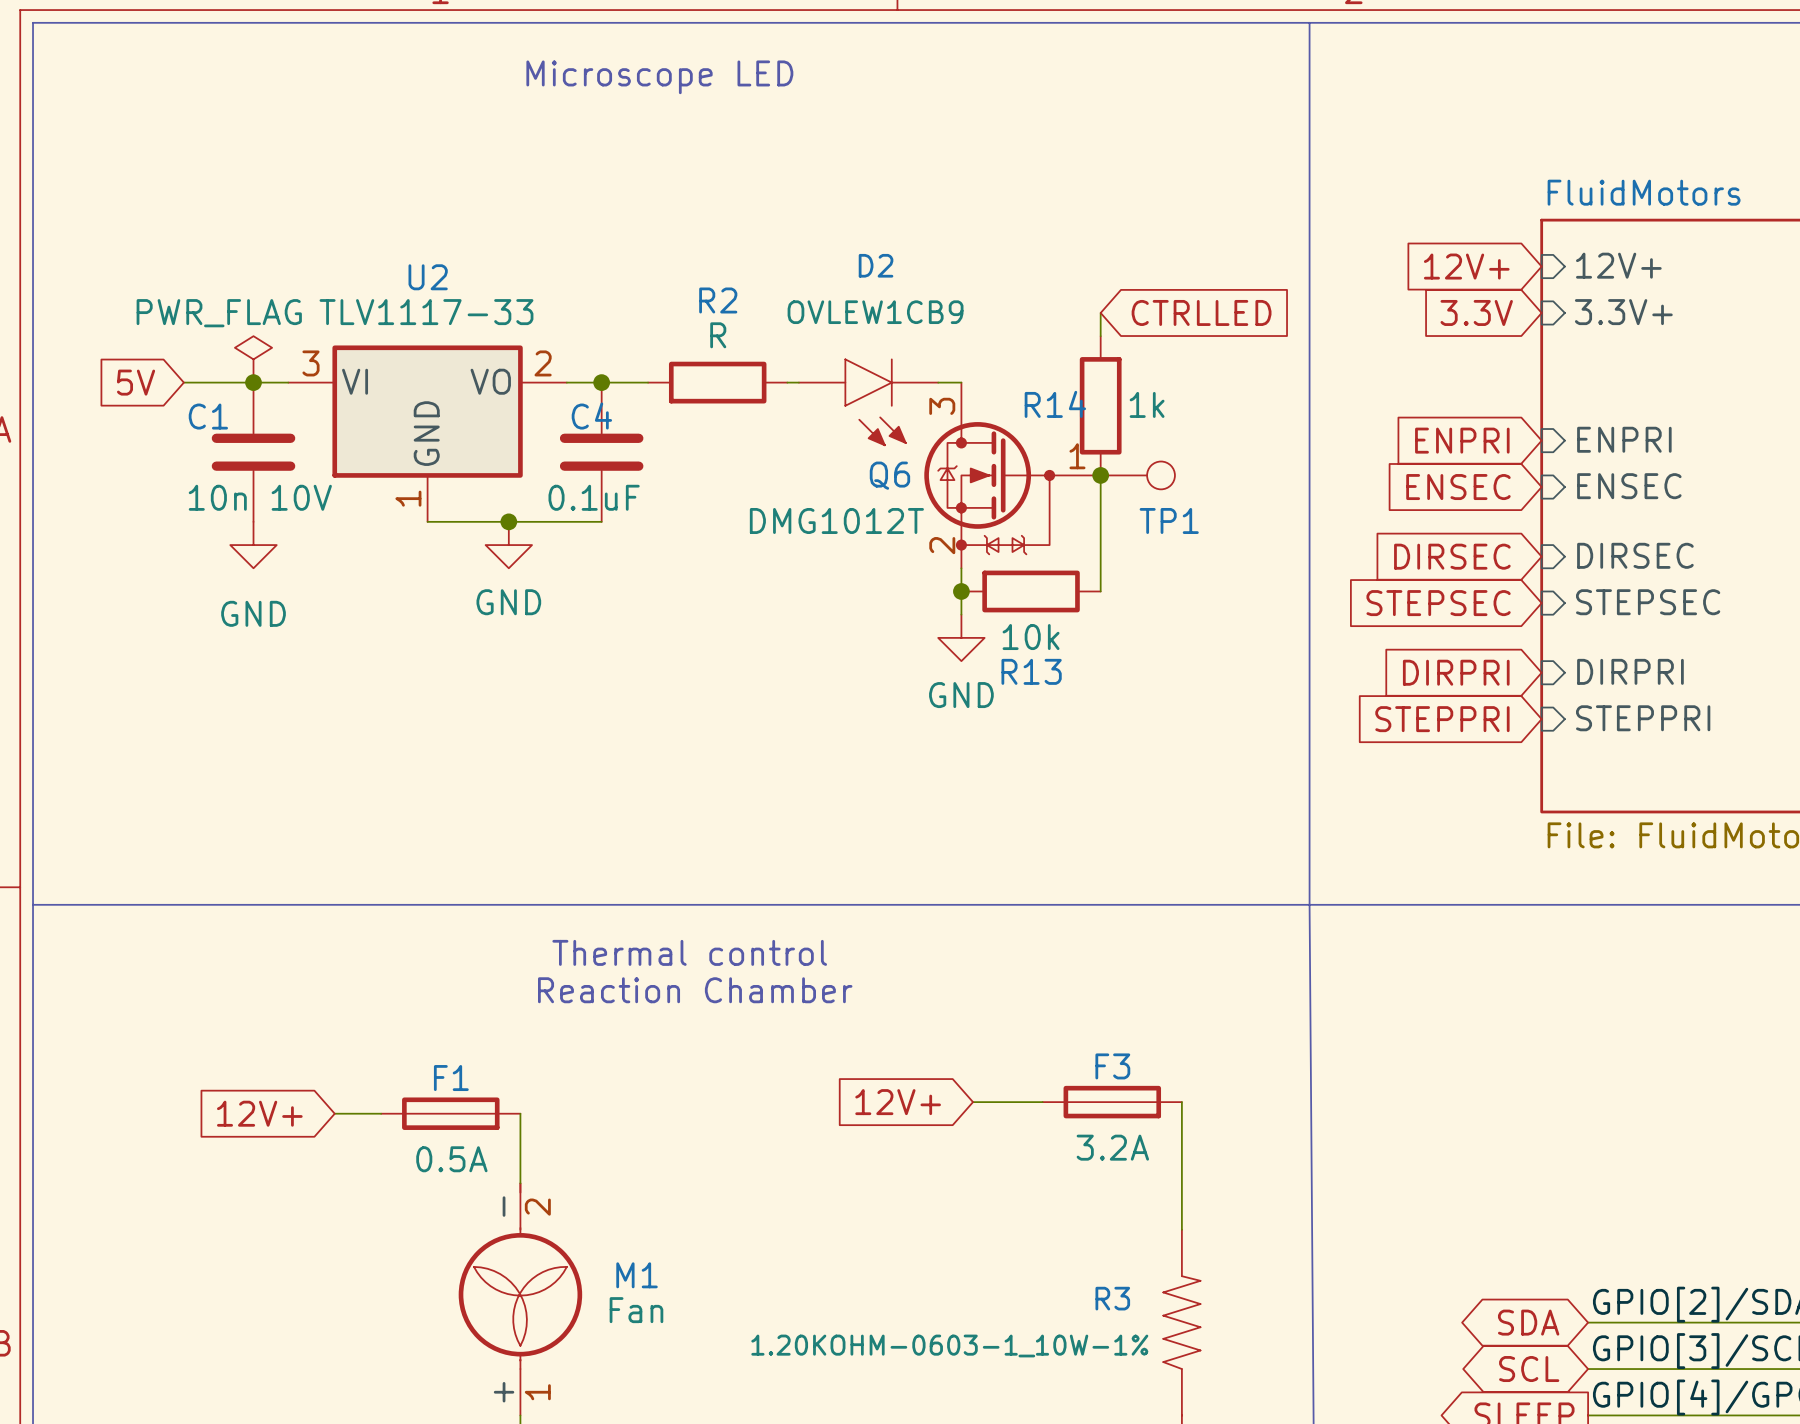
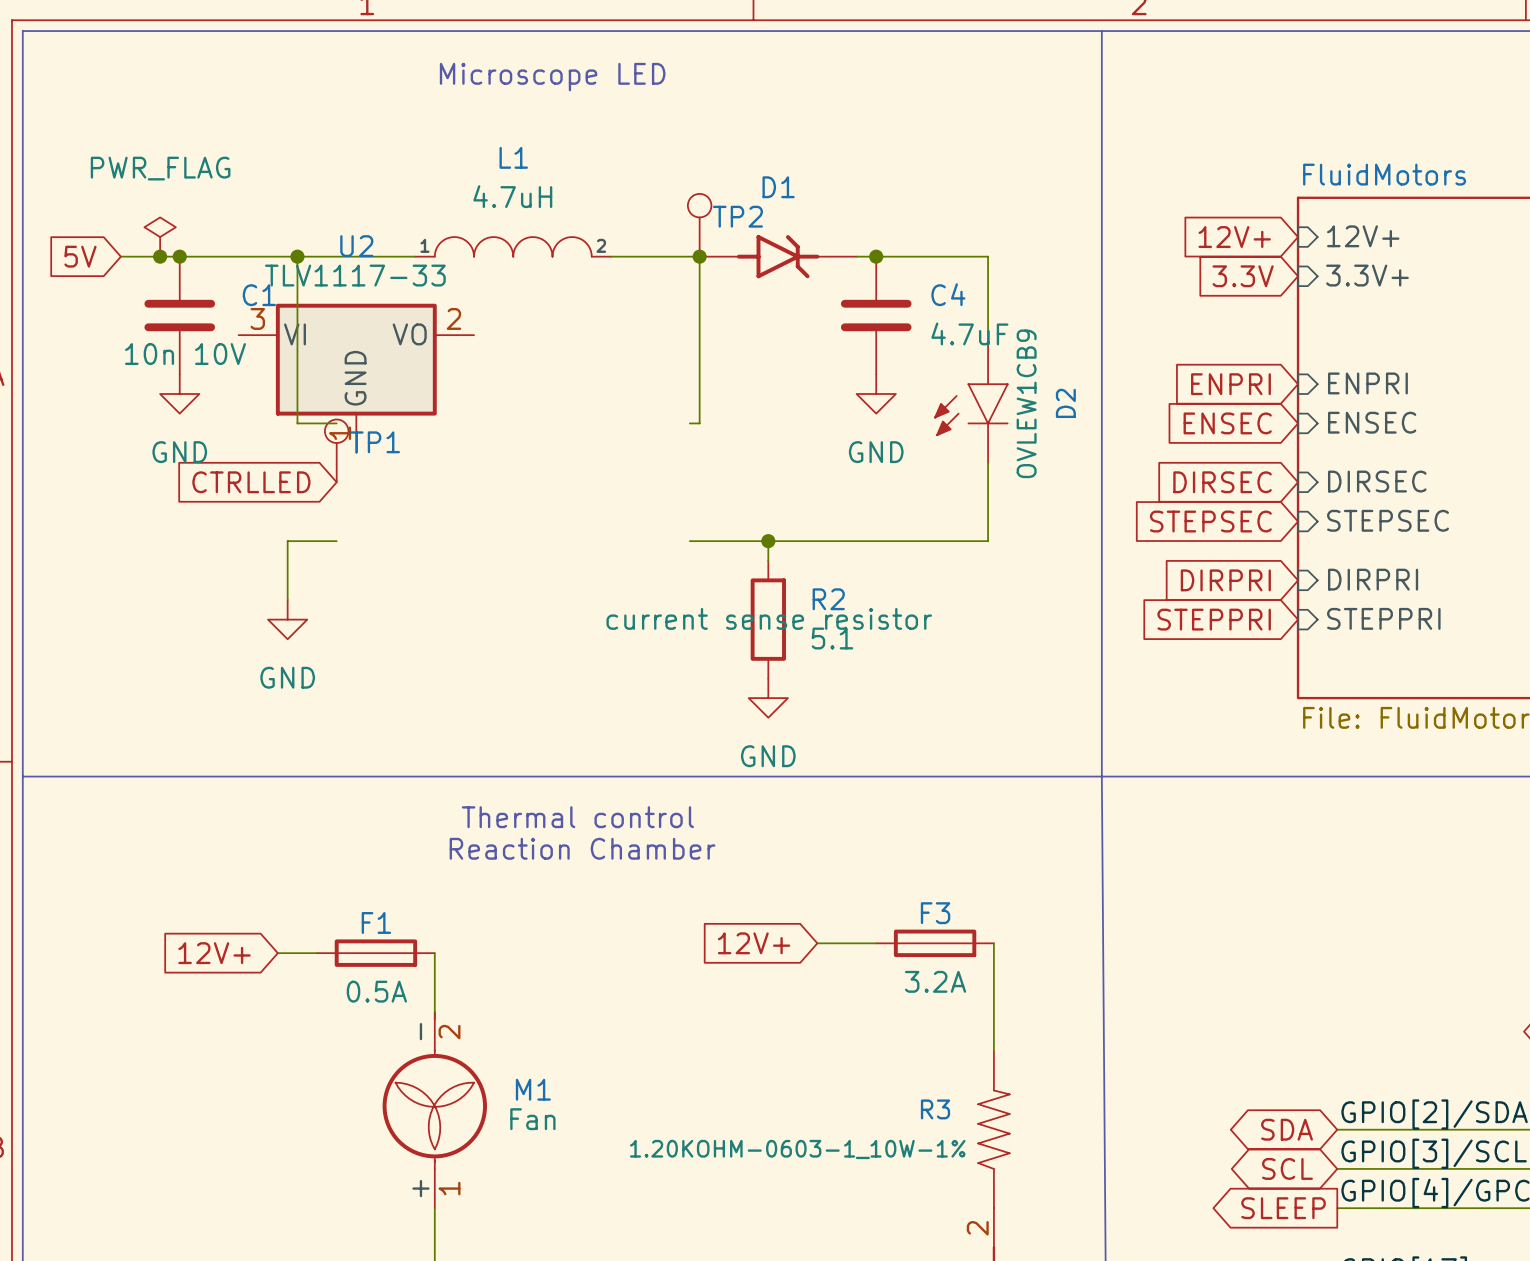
TP2: none -> (699, 225)
L1: none -> 4.7uH (513, 246)
wire: none -> (120, 256) (415, 256)
junction: none -> (160, 256)
junction: none -> (179, 256)
wire: none -> (297, 256) (297, 423) (336, 423)
junction: none -> (297, 256)
wire: none -> (611, 256) (699, 256) (699, 423) (689, 423)
junction: none -> (699, 256)
D1: none -> (778, 256)
wire: none -> (856, 256) (988, 256) (988, 344)
junction: none -> (876, 256)
wire: (1100, 312) (1100, 336) -> (768, 541) (768, 560)
global label: CTRLLED (1201, 312) -> none
power symbol text position: PWR_FLAG (219, 313) -> PWR_FLAG (160, 168)
R2 value: R (718, 335) -> 5.1 (832, 638)
power symbol position: PWR_FLAG (253, 359) -> PWR_FLAG (160, 237)
global label position: 5V (136, 382) -> 5V (80, 256)
wire: (183, 382) (288, 382) -> none
junction: (253, 382) -> none
wire: (566, 382) (648, 382) -> none
junction: (601, 382) -> none
R2 rotation: 0° (717, 382) -> 90° clockwise (768, 619)
R2 position: (717, 382) -> (768, 619)
wire: (787, 382) (798, 382) -> none
wire: (938, 382) (961, 382) -> none
D2 position: (868, 402) -> (971, 403)
D2 rotation: 0° (875, 402) -> 90° clockwise (971, 409)
R14: 1k (1100, 405) -> none
C4 name position: C4 (591, 415) -> C4 (948, 294)
C1 name position: C1 (208, 416) -> C1 (259, 295)
power symbol: none -> GND (179, 394)
C1 position: (253, 452) -> (179, 315)
C4 position: (601, 452) -> (876, 315)
power symbol: none -> GND (876, 394)
Q6: DMG1012T (1012, 475) -> none
wire: (1100, 475) (1100, 591) -> none
junction: (1100, 475) -> none
TP1 position: (1137, 475) -> (336, 450)
TP1 rotation: 0° (1161, 475) -> 90° counterclockwise (336, 431)
C4 value: 0.1uF (594, 497) -> 4.7uF (969, 333)
wire: (427, 521) (601, 521) -> none
junction: (508, 521) -> none
wire: none -> (988, 462) (988, 541) (689, 541)
power symbol: GND (253, 545) -> none
power symbol: GND (508, 545) -> none
global label: none -> CTRLLED (251, 482)
wire: (961, 568) (961, 614) -> none
junction position: (961, 591) -> (768, 541)
R13: 10k (1031, 591) -> none
wire: none -> (336, 541) (287, 541) (287, 600)
power symbol: GND (961, 637) -> none
R2 text: none -> current sense resistor (769, 618)
power symbol: none -> GND (287, 619)
power symbol: none -> GND (768, 698)

